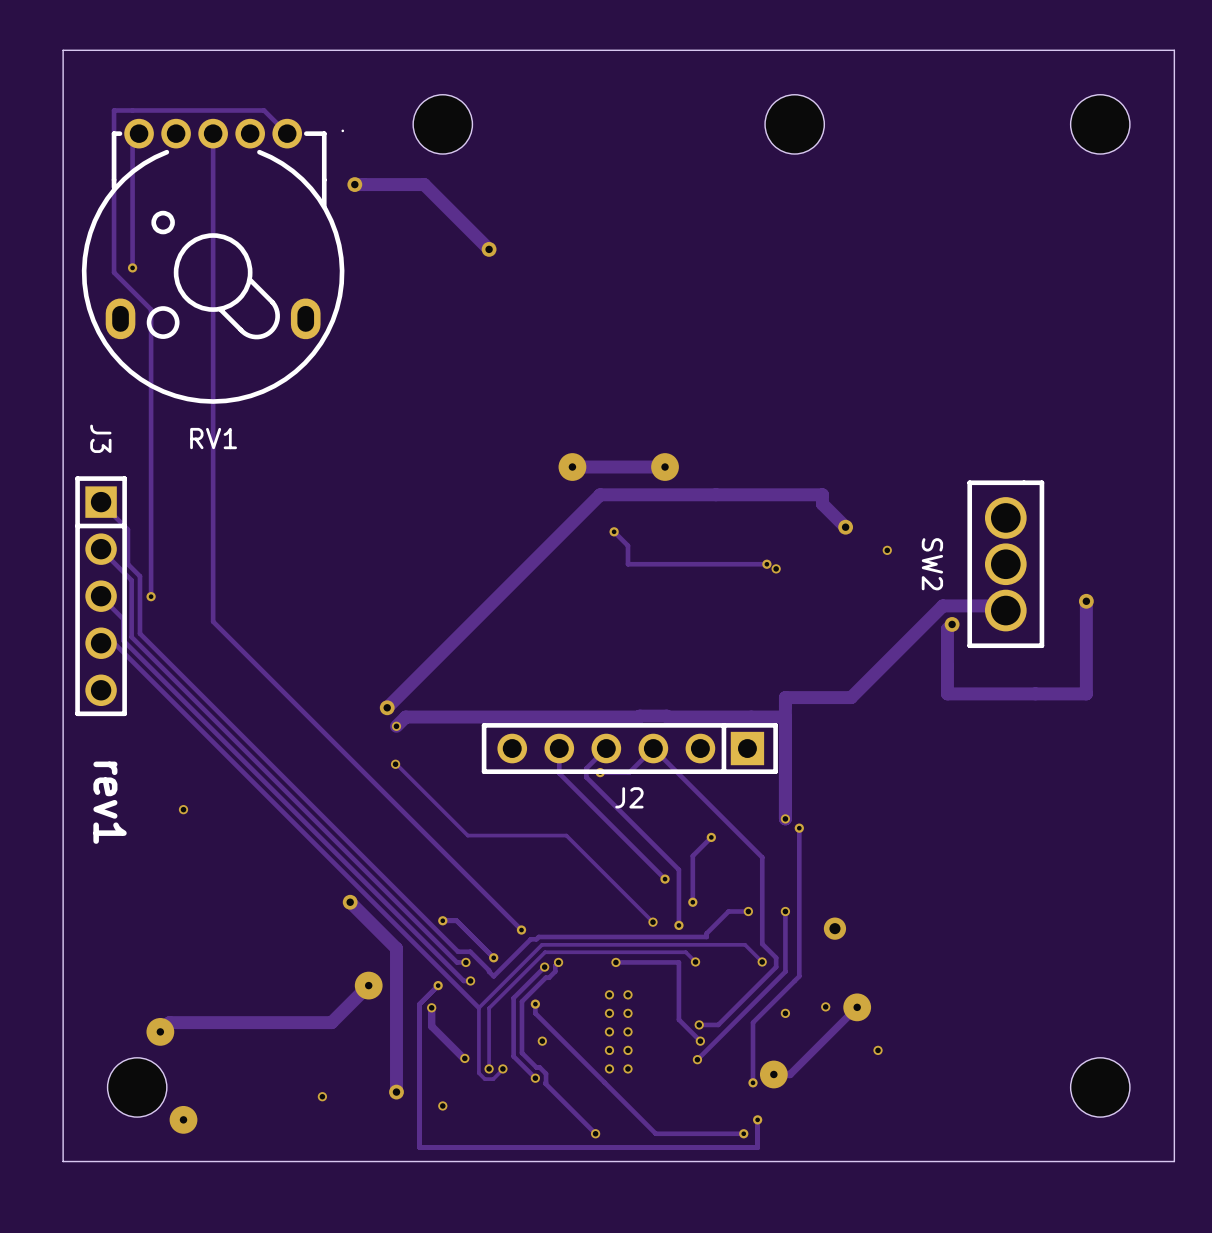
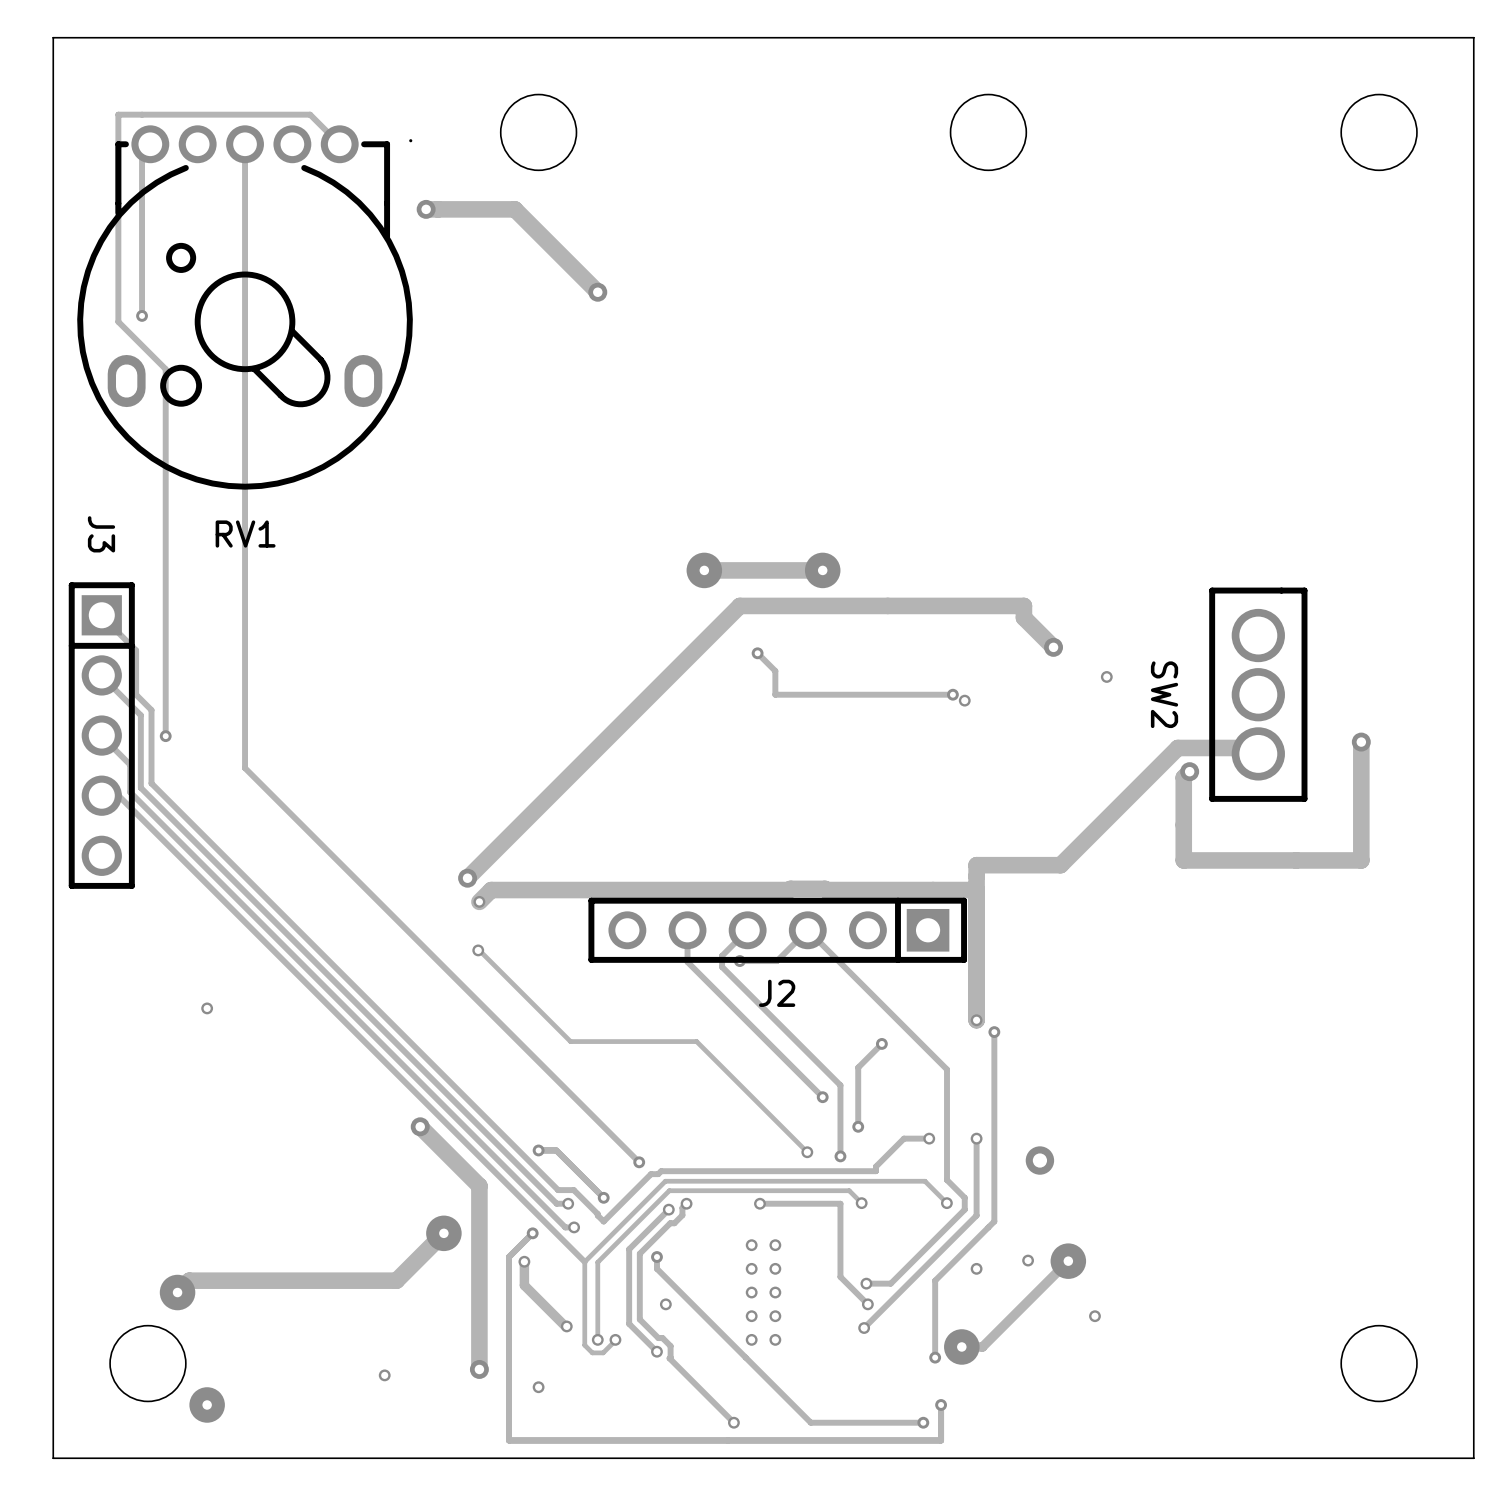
text: rev1 (110, 802) -> none

